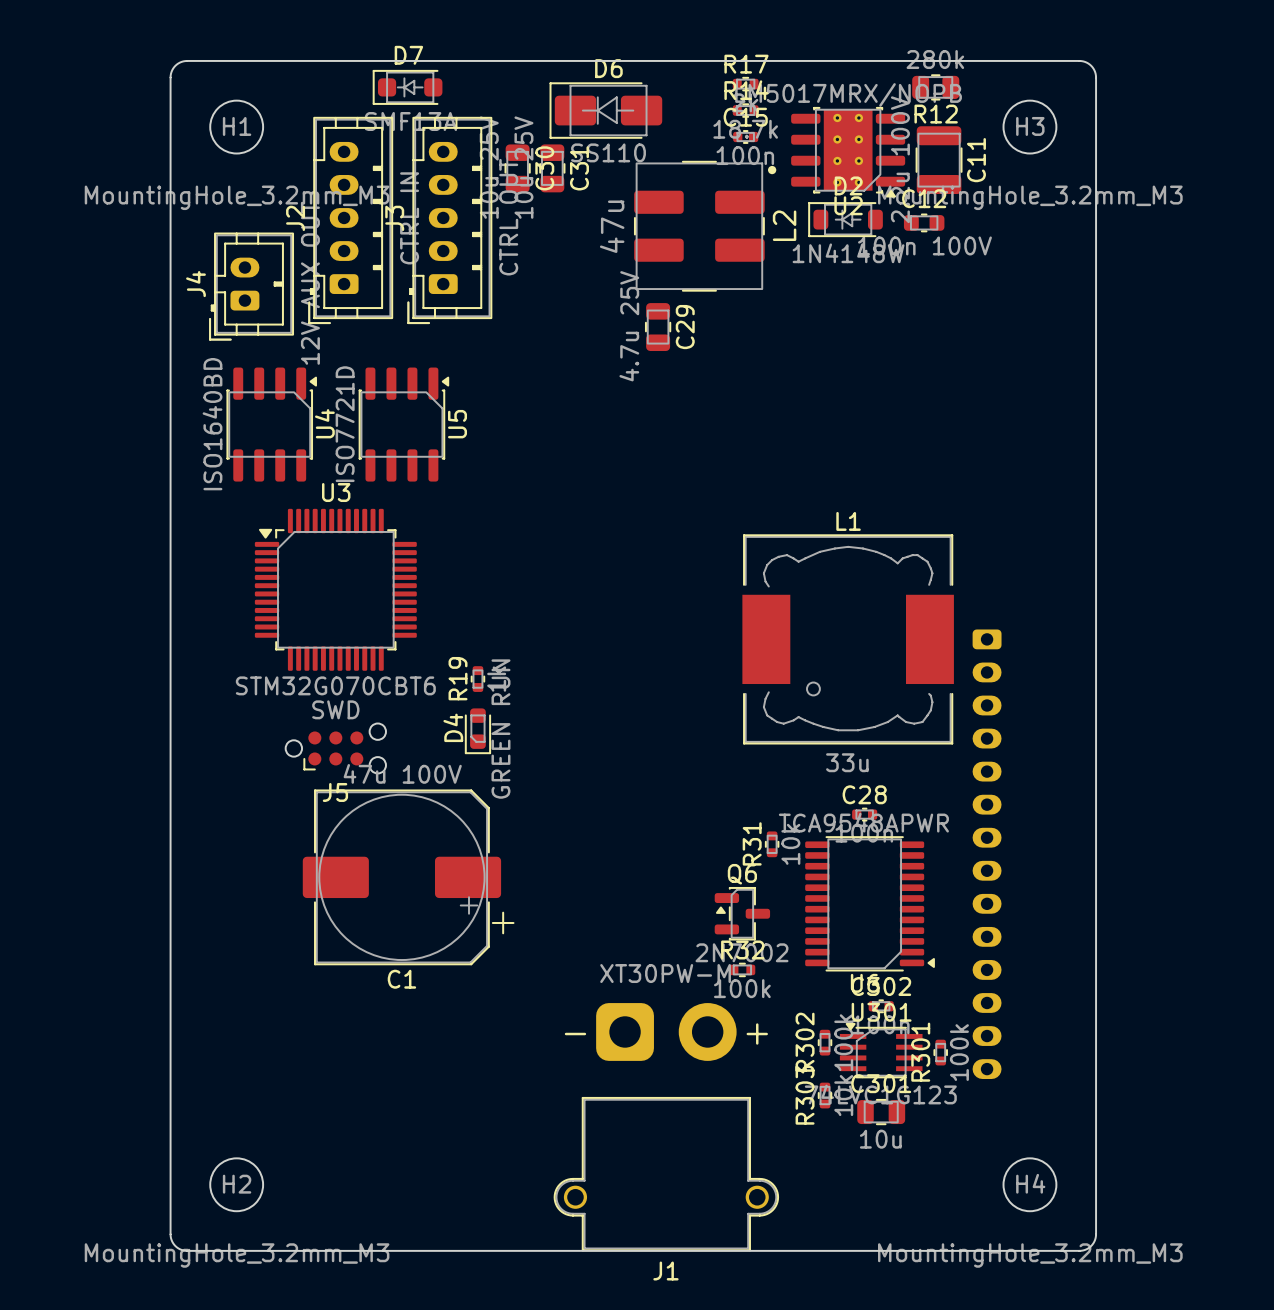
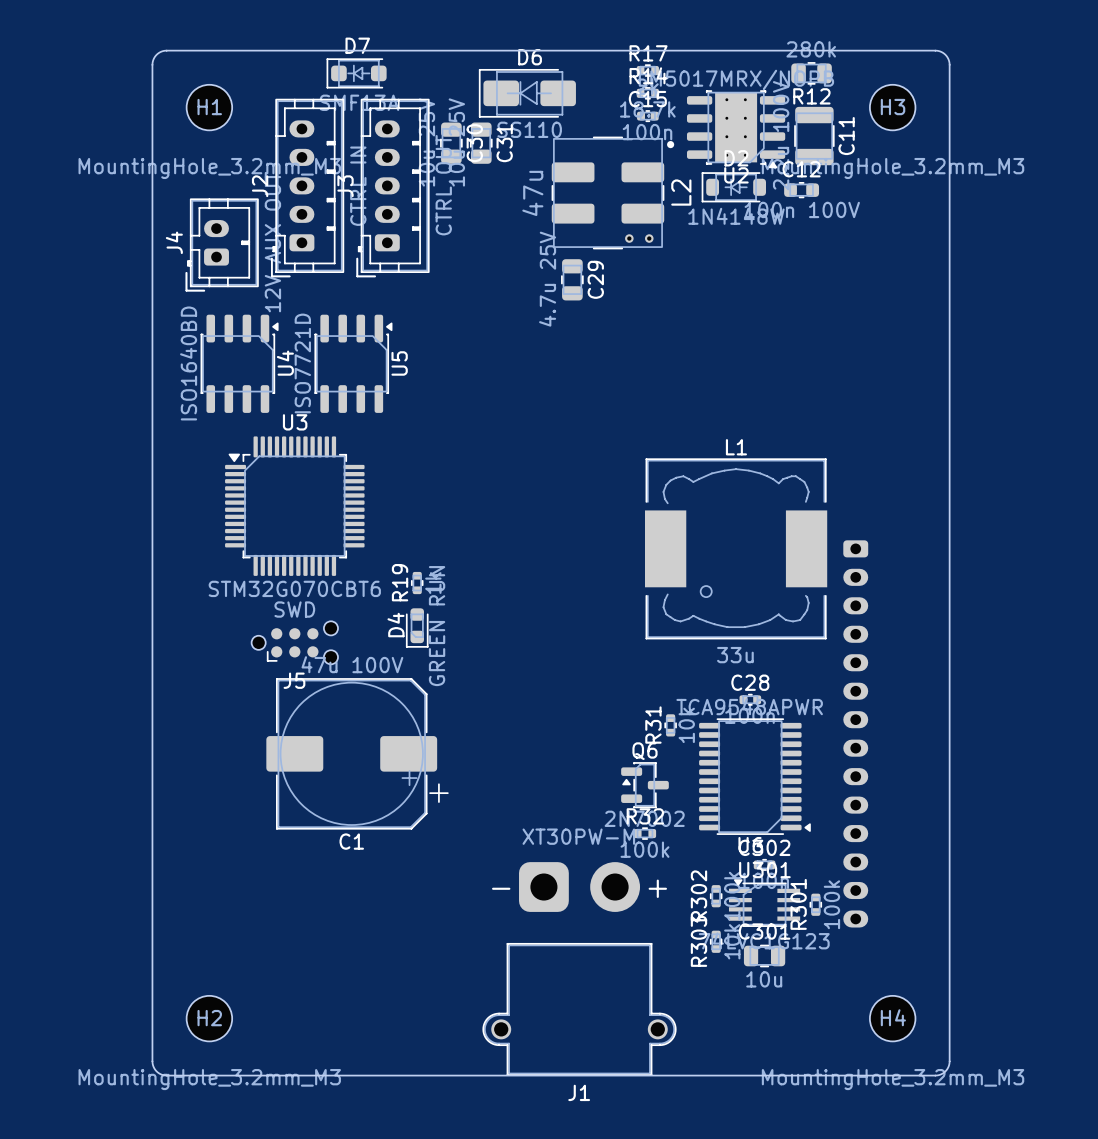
part: none -> (629, 238)
part: none -> (649, 238)

